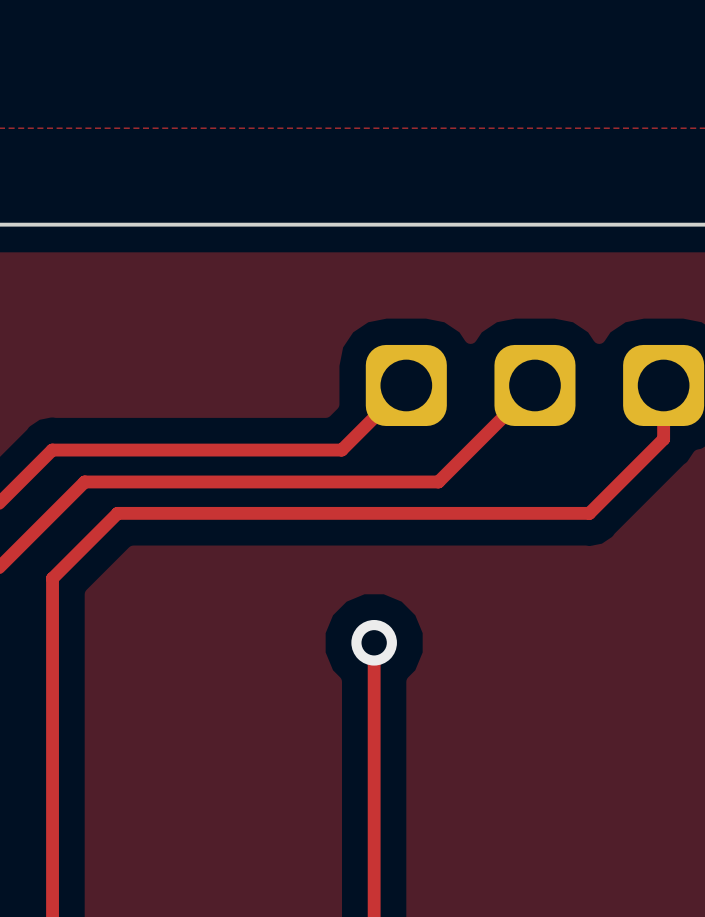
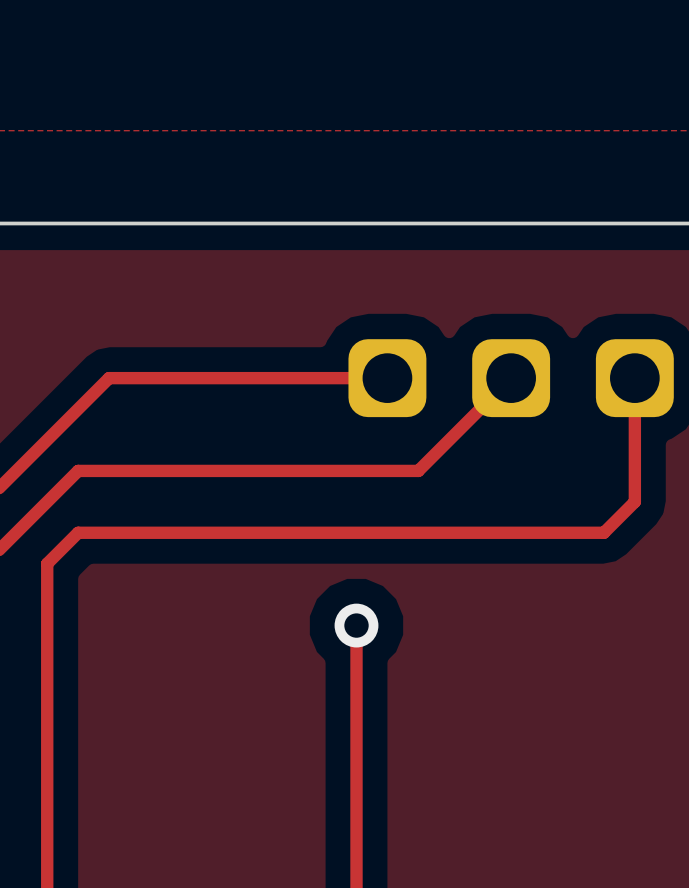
track: (406, 385) (341, 450) (52, 450) -> (387, 378) (109, 378) (46, 440)
track: (663, 439) (589, 513) (117, 513) (84, 546) -> (634, 429) (634, 501) (603, 532) (78, 532)

